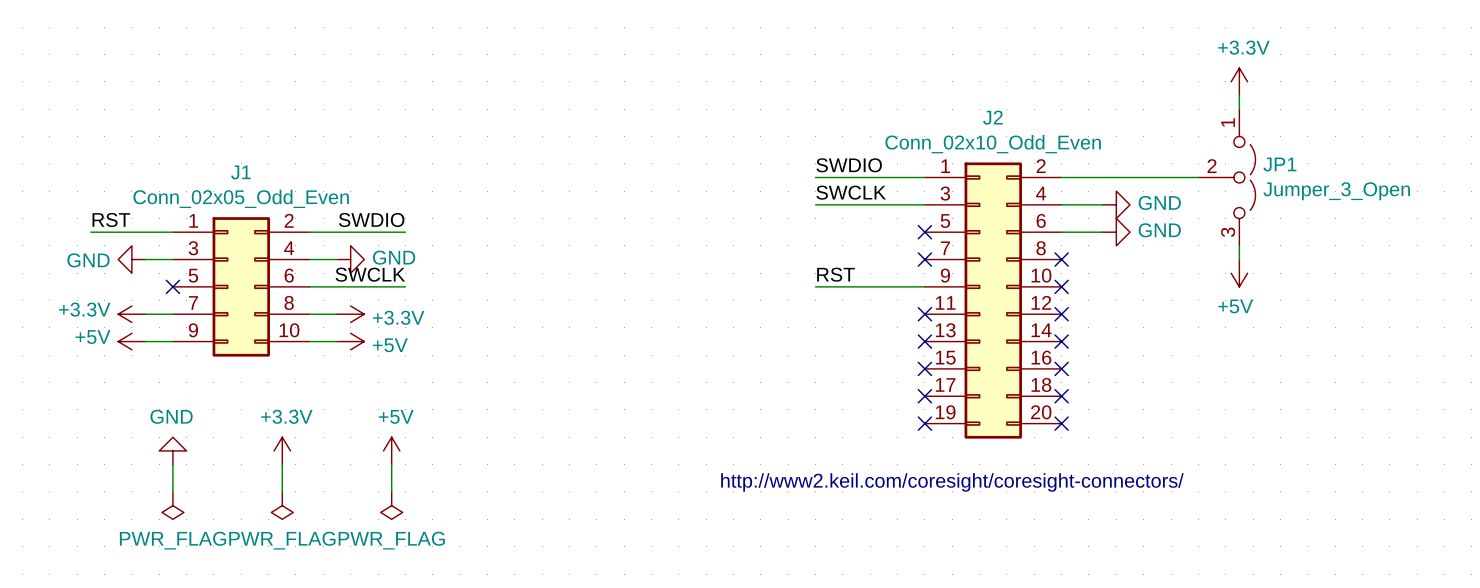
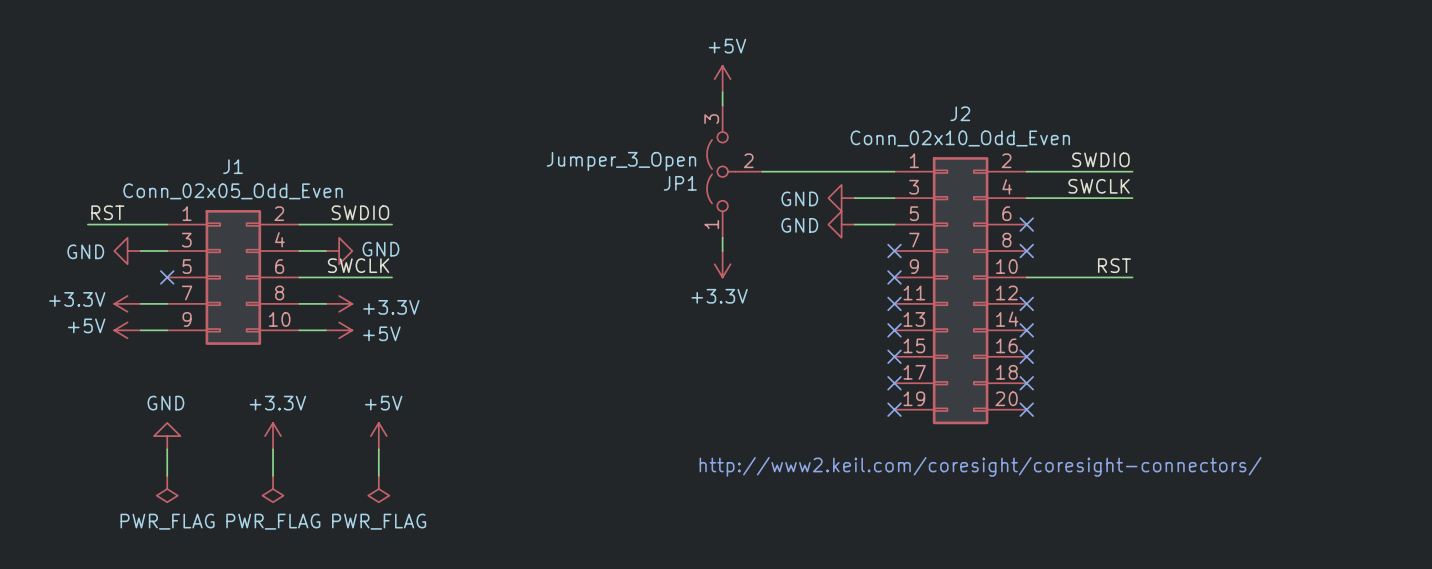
power symbol: none -> +5V (722, 79)
power symbol: +3.3V (1239, 81) -> none
wire: none -> (722, 92) (722, 105)
wire: (1239, 95) (1239, 109) -> none
label: SWDIO (849, 165) -> none
label: none -> SWDIO (1100, 159)
wire: none -> (762, 171) (788, 171)
wire: (1171, 177) (1198, 177) -> none
JP1 position: (1226, 177) -> (734, 171)
JP1 rotation: 0° (1240, 177) -> 180° (721, 171)
label: SWCLK (851, 192) -> none
label: none -> SWCLK (1099, 186)
wire: (815, 204) (883, 204) -> none
power symbol: none -> GND (841, 198)
wire: none -> (1066, 198) (1132, 198)
power symbol: GND (1116, 204) -> none
power symbol: none -> GND (841, 224)
no-connect mark position: (924, 232) -> (894, 277)
wire: (1061, 232) (1102, 232) -> (854, 224) (894, 224)
power symbol: GND (1116, 232) -> none
wire: none -> (722, 237) (722, 251)
wire: (1239, 245) (1239, 259) -> none
power symbol: none -> +3.3V (722, 264)
power symbol: +5V (1239, 273) -> none
label: RST (835, 274) -> none
label: none -> RST (1114, 265)
wire: (815, 286) (924, 286) -> (1026, 277) (1132, 277)
no-connect mark position: (1061, 286) -> (1026, 224)

